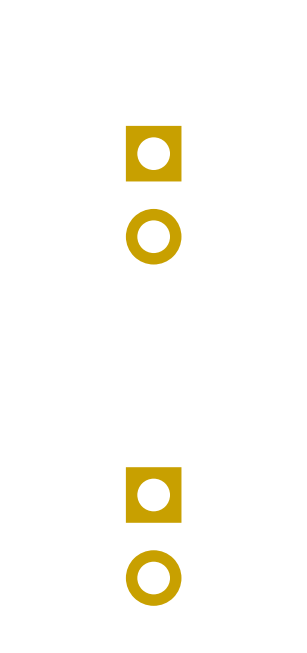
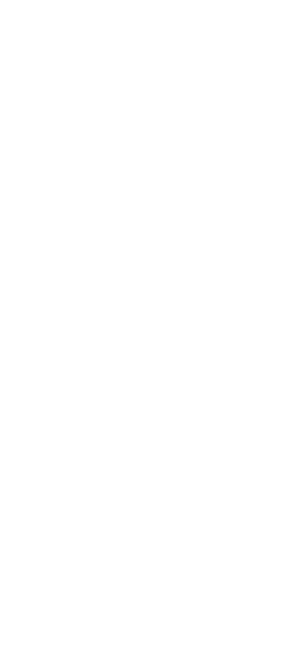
part: (153, 195) -> none
part: (153, 536) -> none

